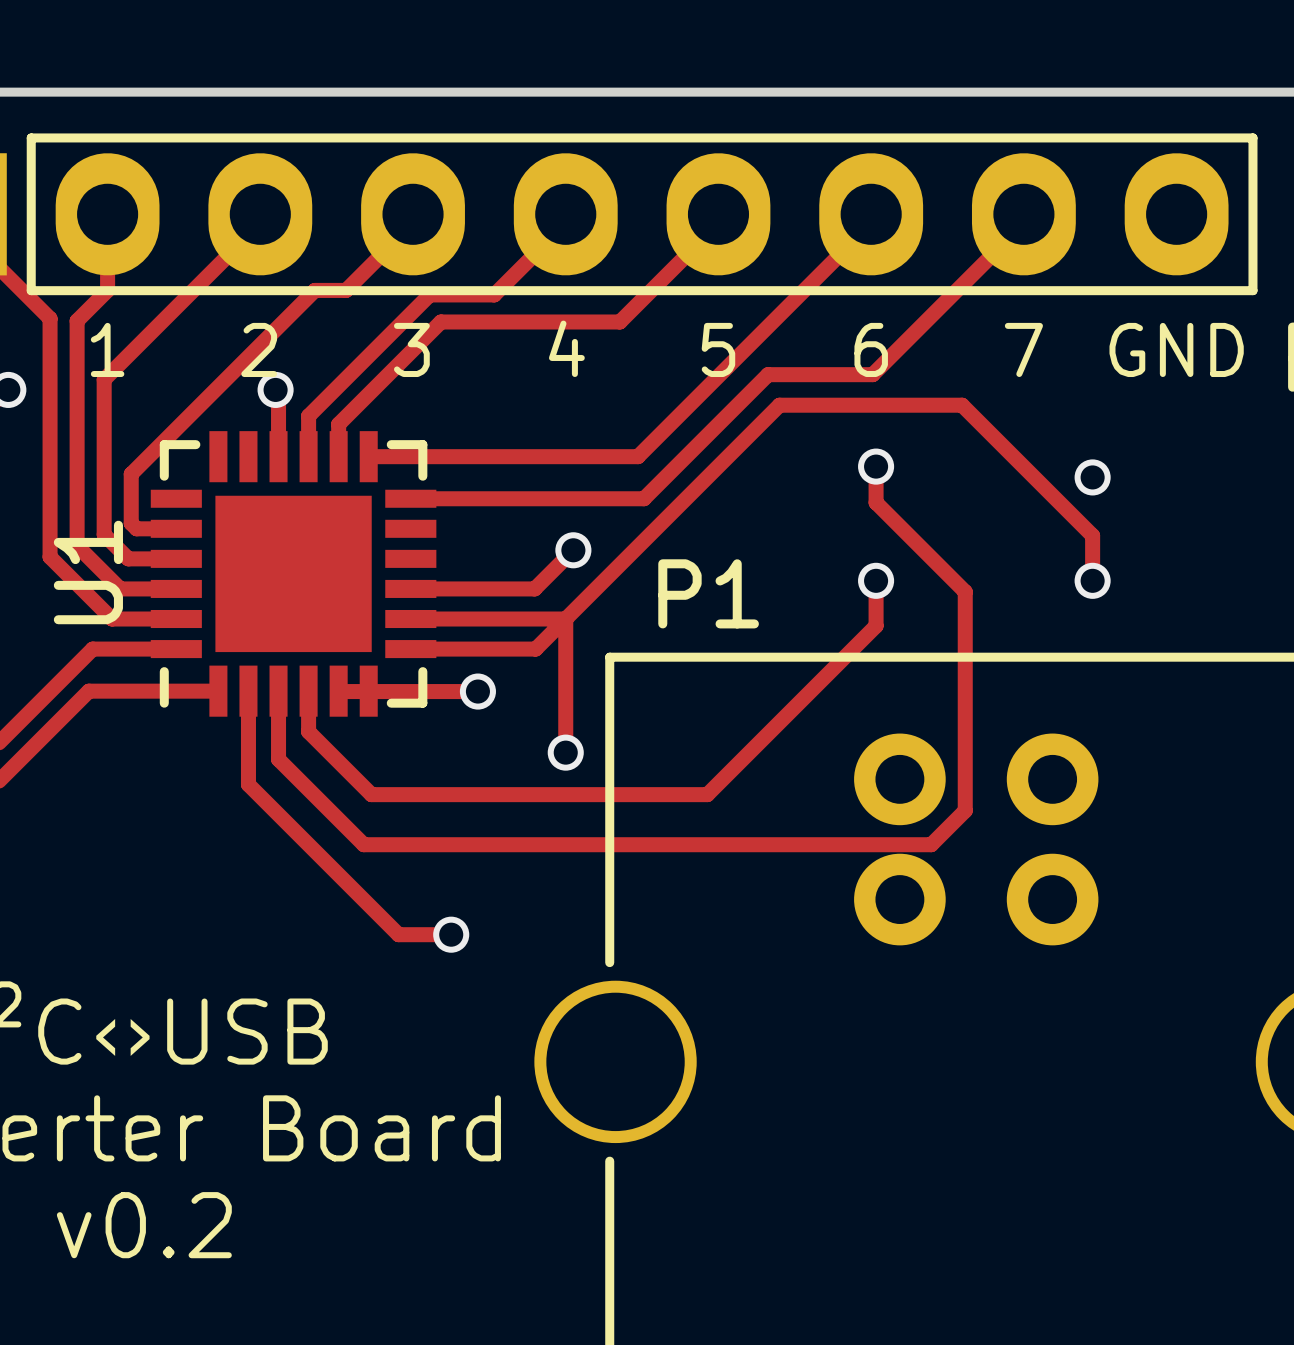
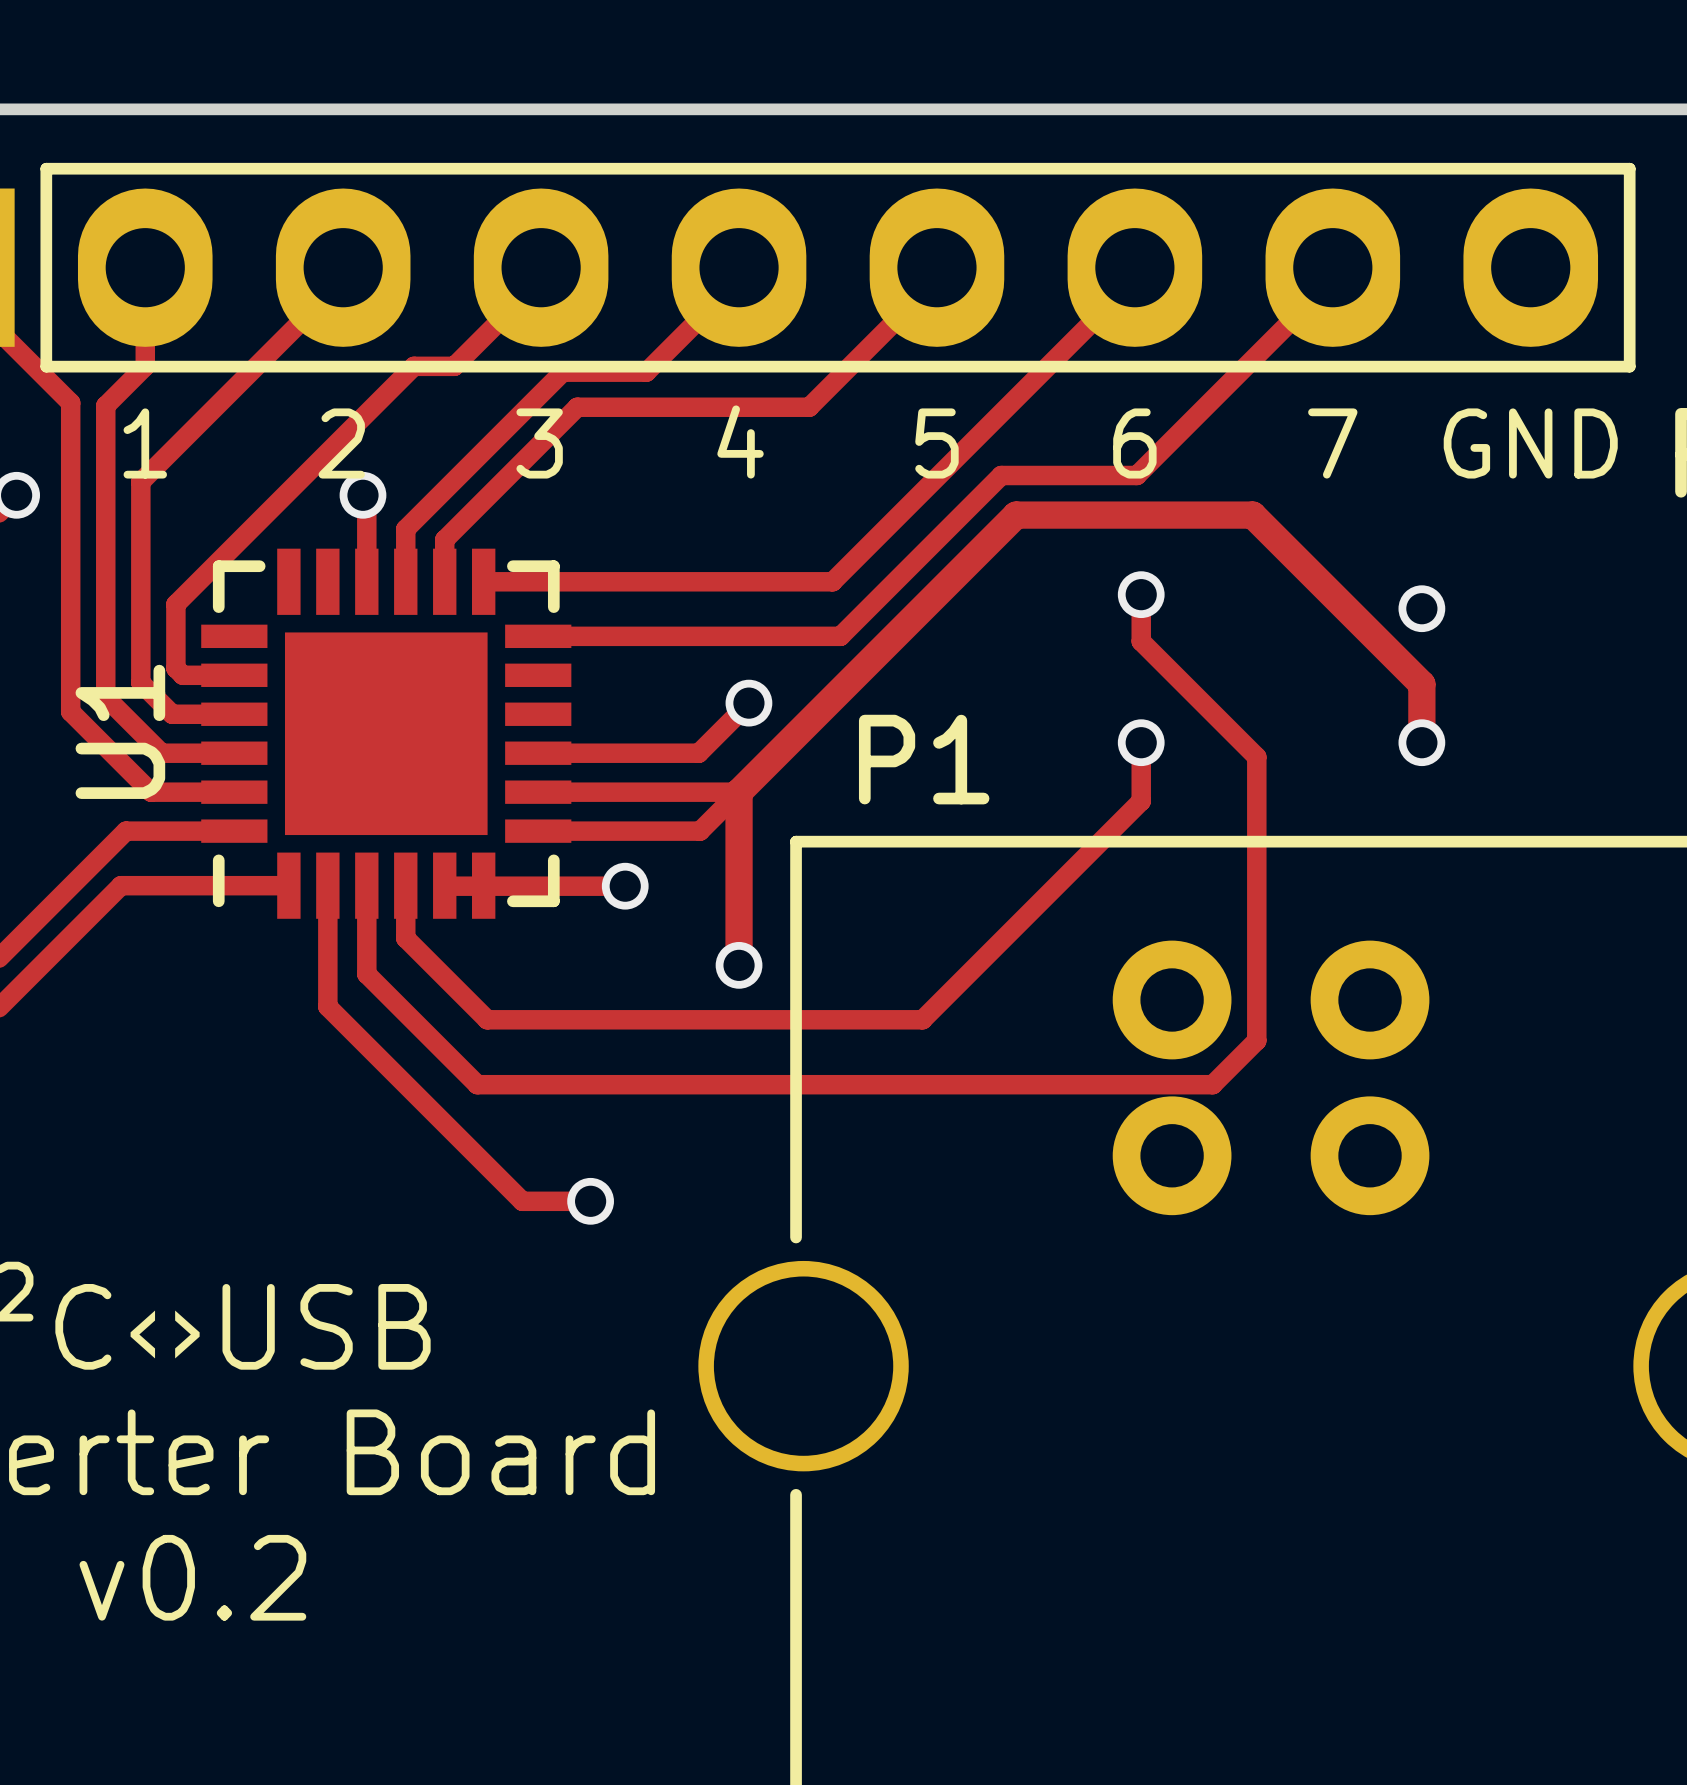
track width: thin (1092, 580) (1092, 535) (962, 405) (779, 405) (565, 619) (565, 752) -> thick (1421, 742) (1421, 684) (1252, 515) (1016, 515) (739, 792) (739, 965)

